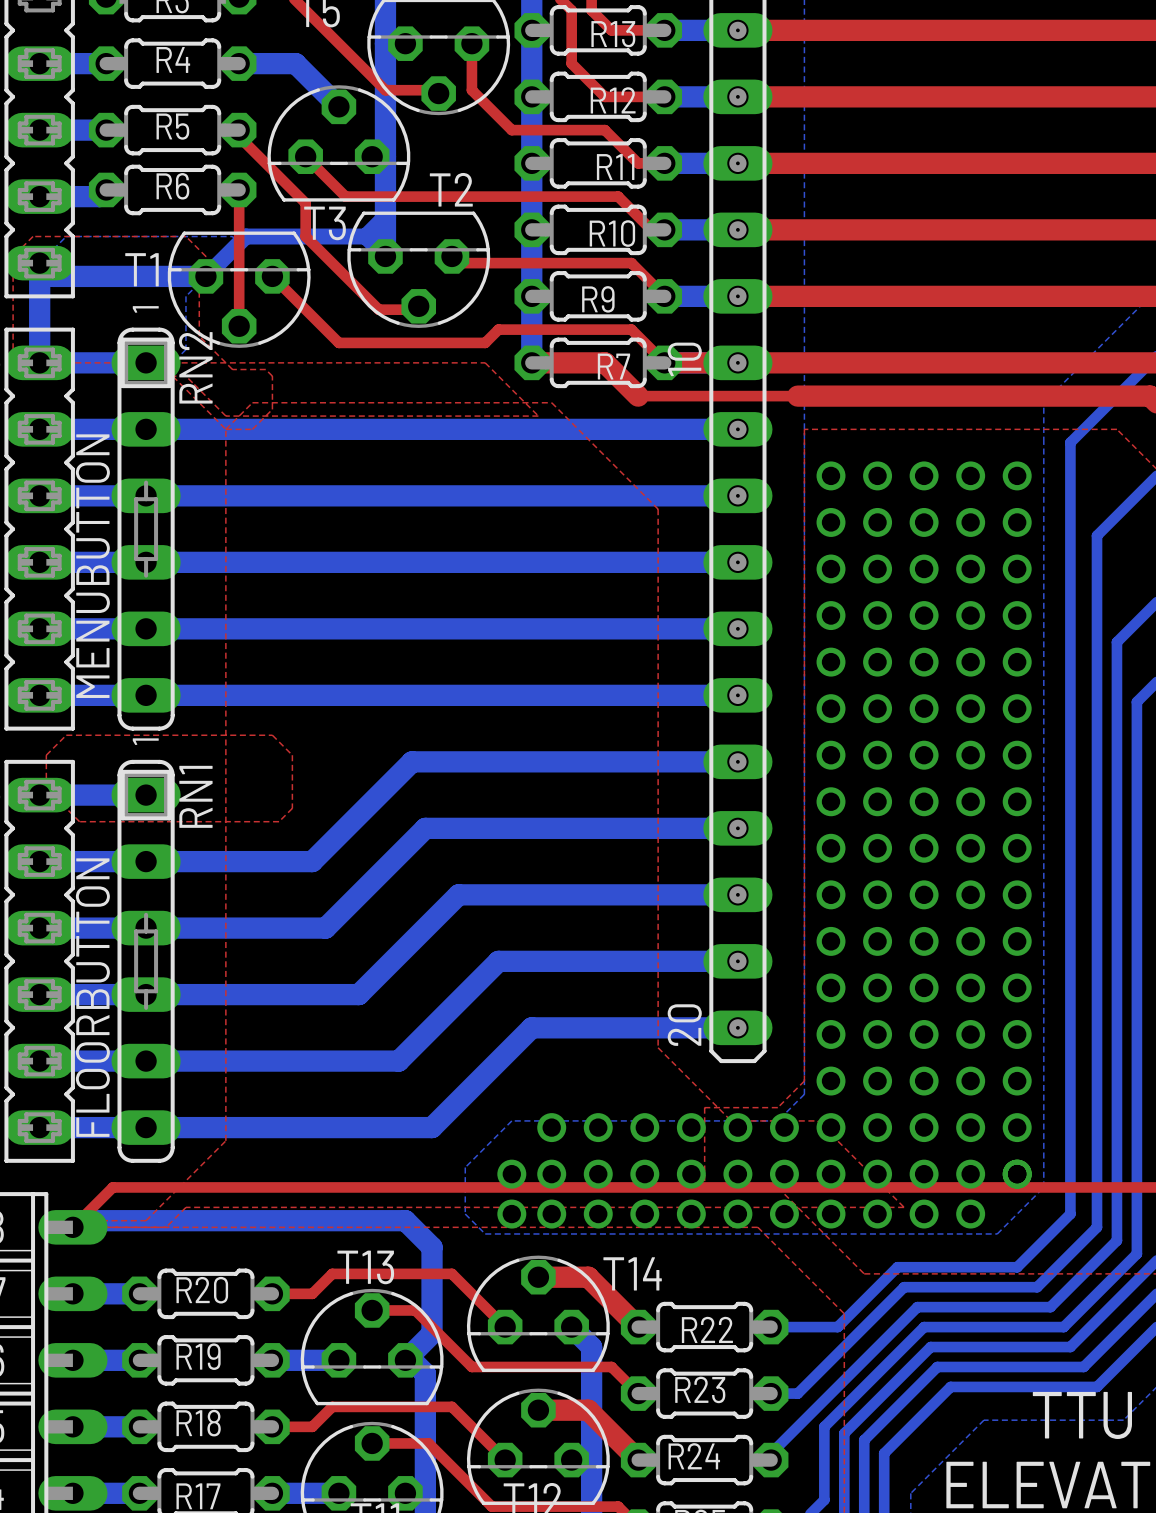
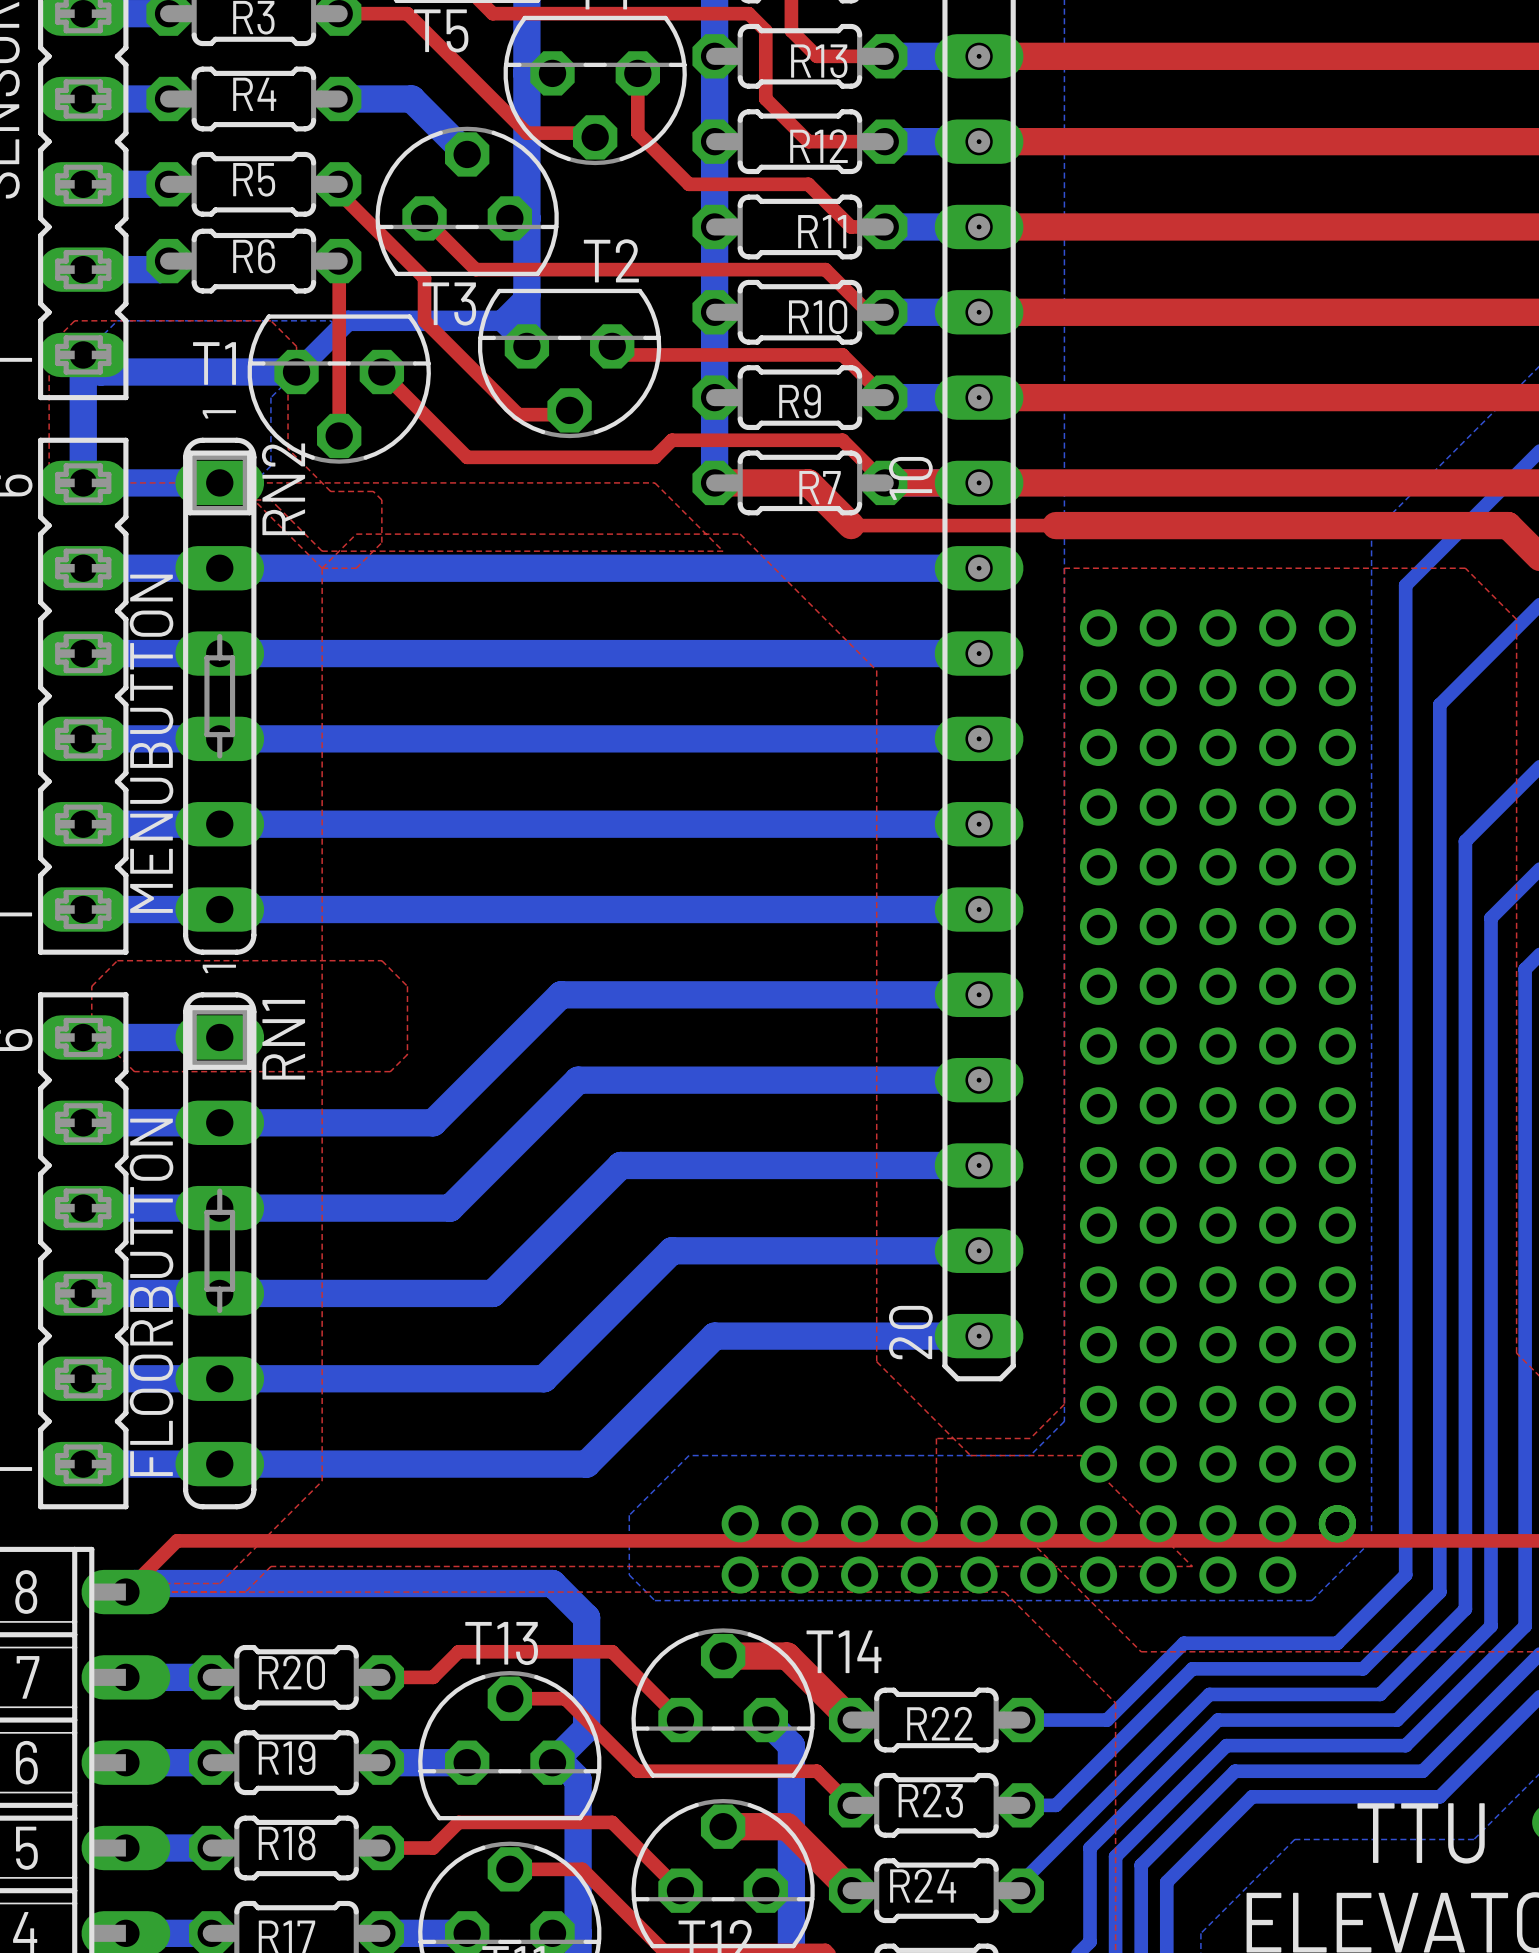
via: (551, 1127) -> none
via: (598, 1127) -> none
via: (644, 1127) -> none
via: (691, 1127) -> none
via: (737, 1127) -> none
via: (784, 1127) -> none
via: (511, 1174) -> none
via: (511, 1214) -> none

